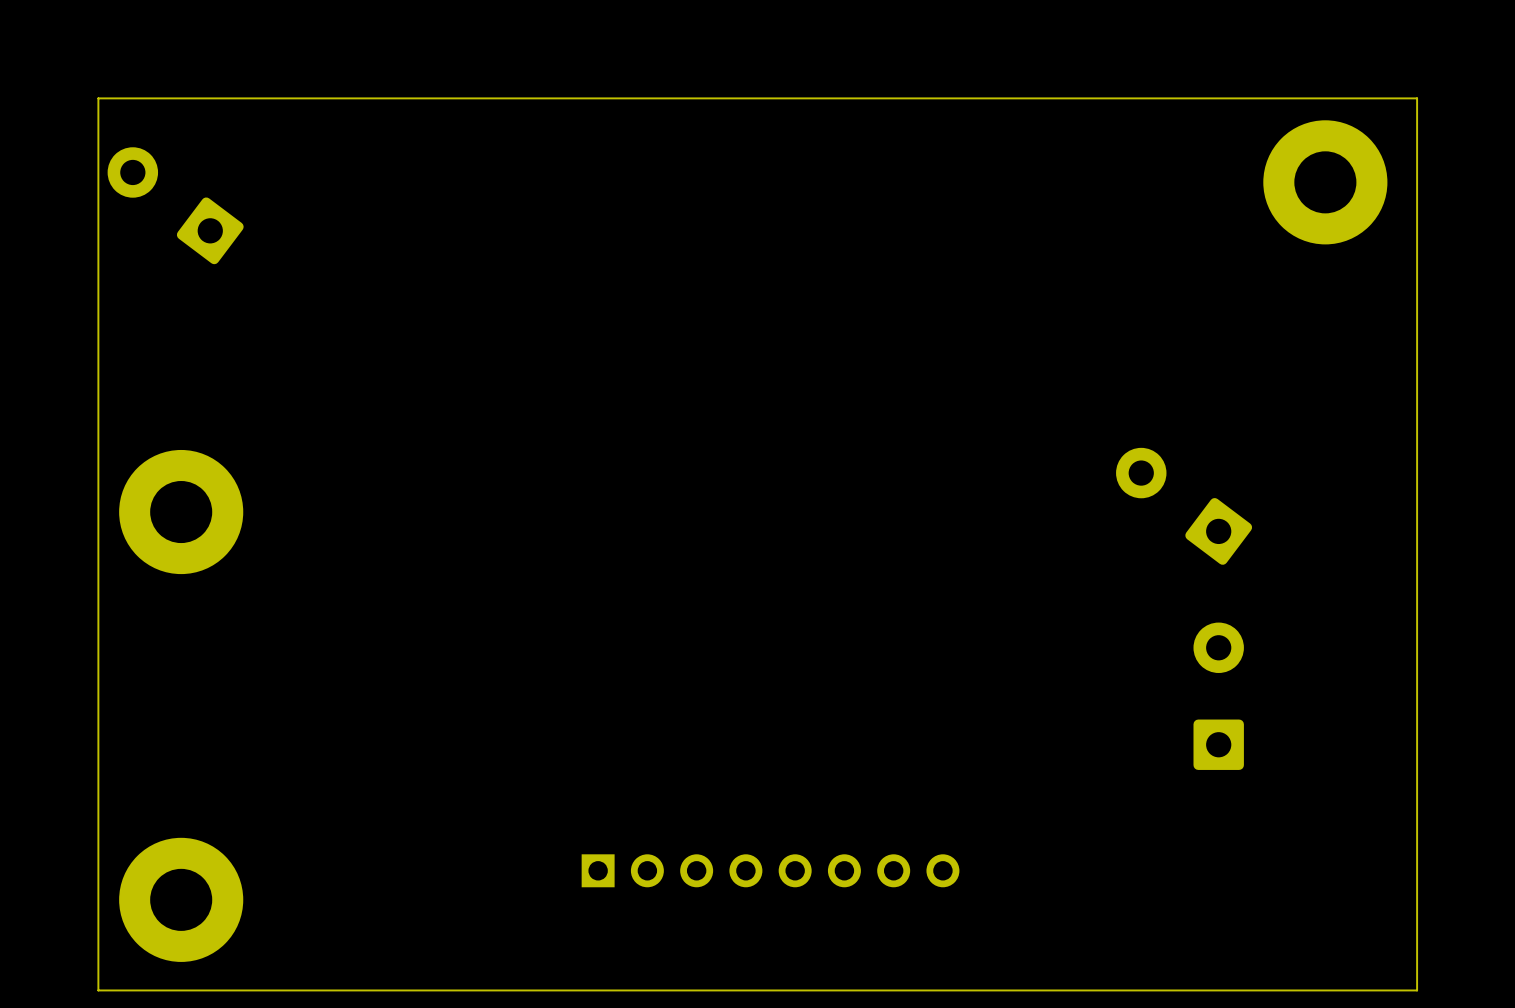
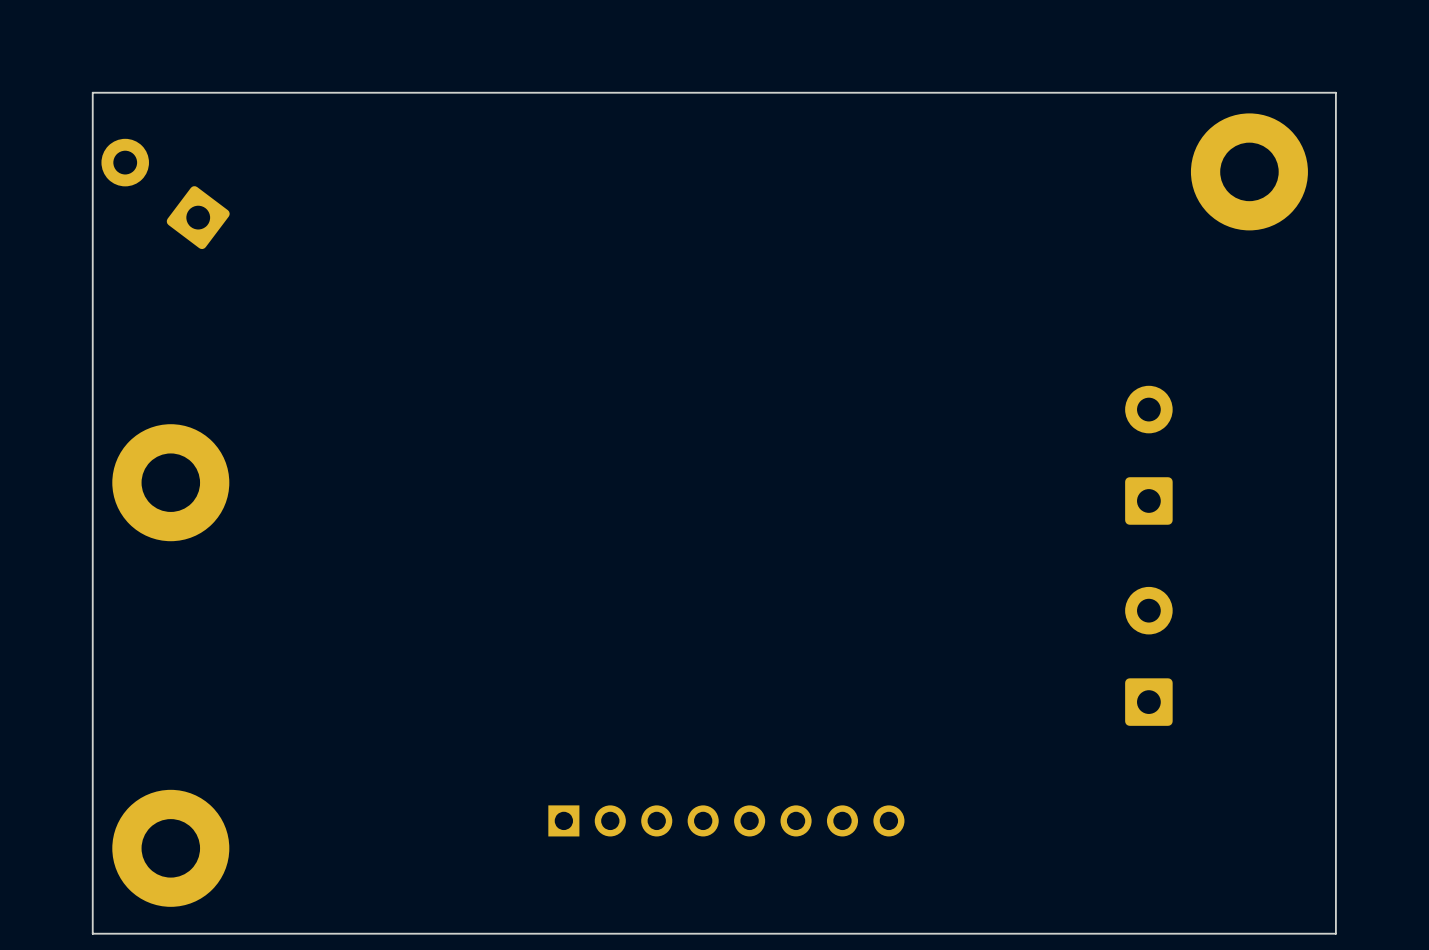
part: none -> (1148, 455)
part: (1184, 506) -> none

